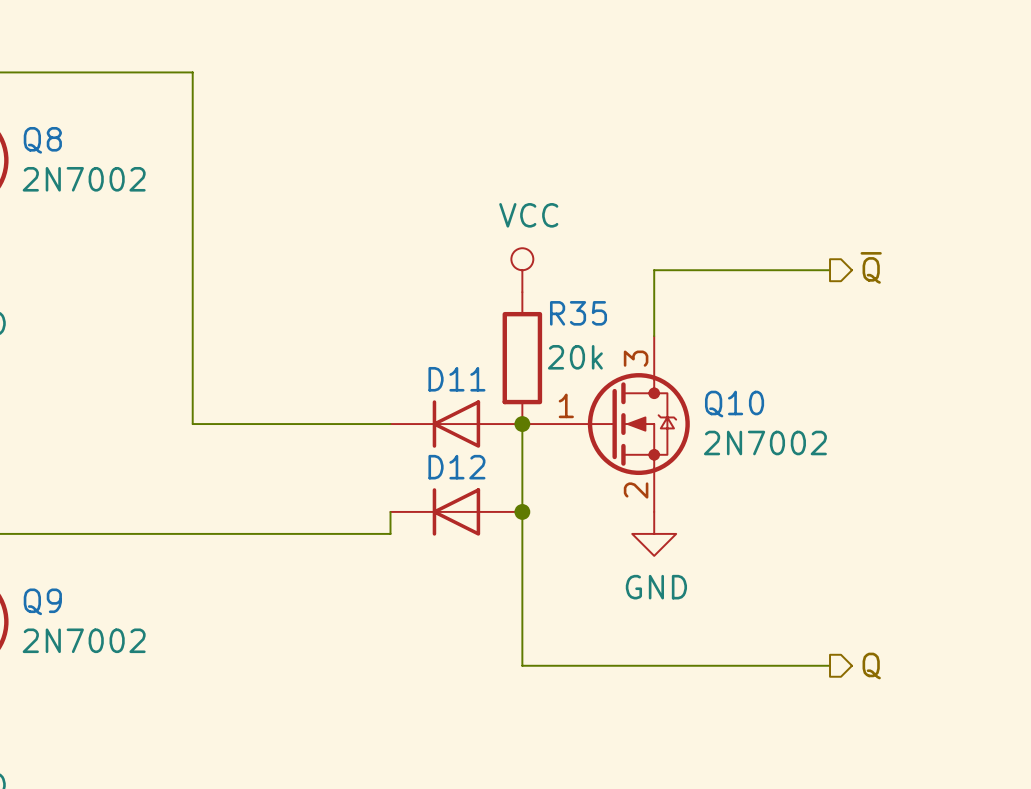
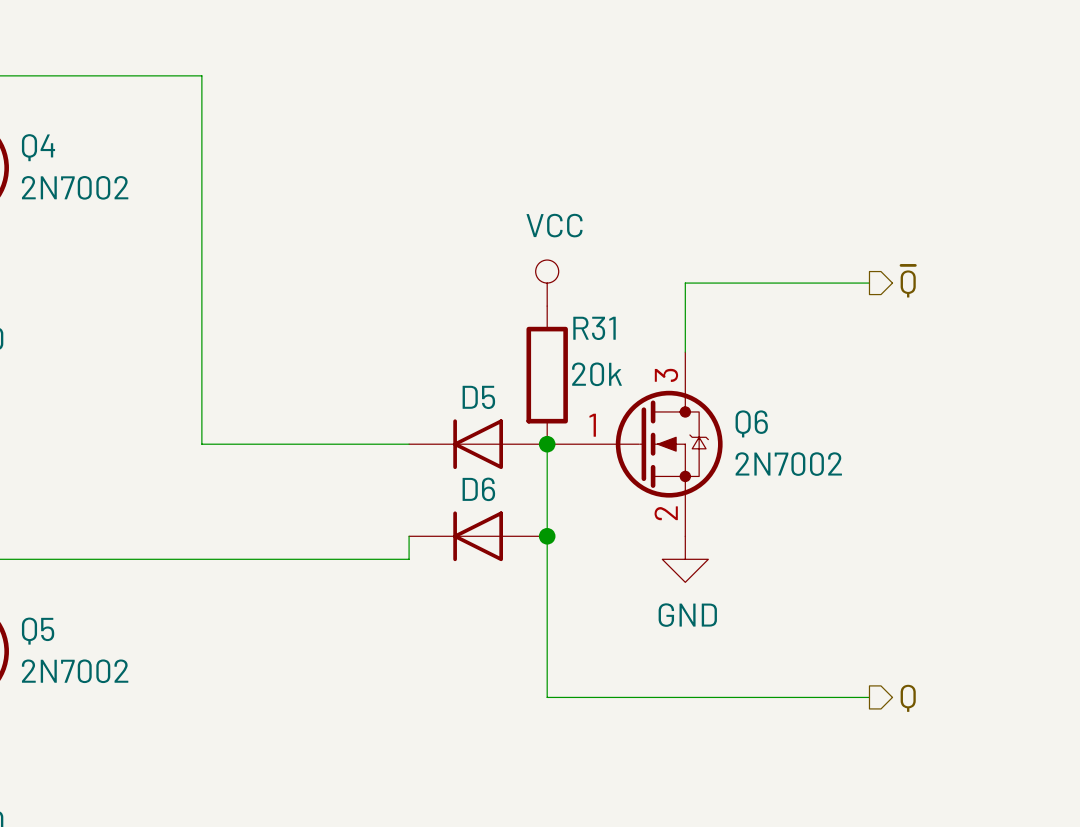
Q8 name: Q8 (42, 140) -> Q4 (38, 147)
R35 name: R35 (578, 313) -> R31 (594, 328)
D11 name: D11 (456, 379) -> D5 (478, 397)
Q10 name: Q10 (734, 404) -> Q6 (751, 423)
D12 name: D12 (456, 467) -> D6 (478, 489)
Q9 name: Q9 (42, 601) -> Q5 (38, 631)

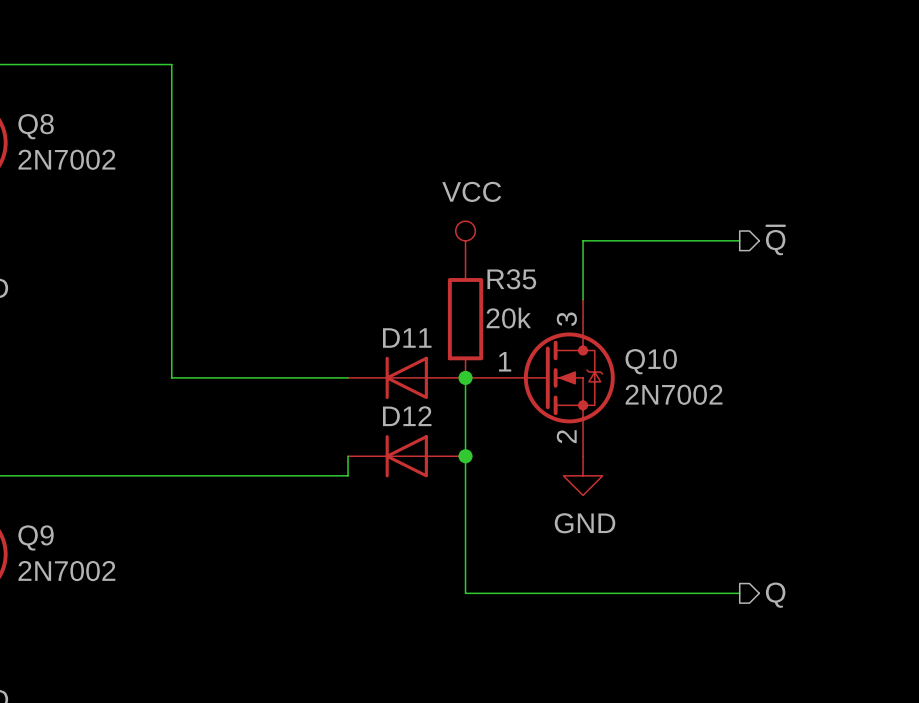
Q4 name: Q4 (38, 147) -> Q8 (36, 126)
R31 name: R31 (594, 328) -> R35 (511, 279)
D5 name: D5 (478, 397) -> D11 (407, 338)
Q6 name: Q6 (751, 423) -> Q10 (651, 361)
D6 name: D6 (478, 489) -> D12 (407, 416)
Q5 name: Q5 (38, 631) -> Q9 (36, 537)

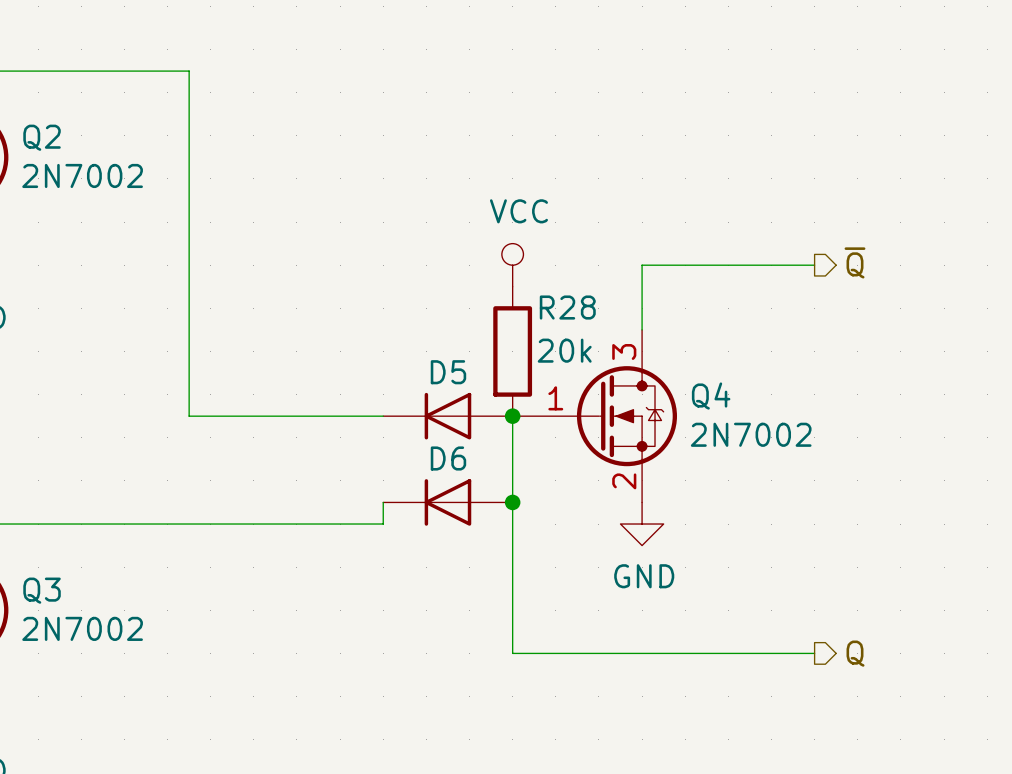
Q8 name: Q8 (36, 126) -> Q2 (42, 137)
R35 name: R35 (511, 279) -> R28 (567, 307)
D11 name: D11 (407, 338) -> D5 (448, 372)
Q10 name: Q10 (651, 361) -> Q4 (711, 396)
D12 name: D12 (407, 416) -> D6 (448, 458)
Q9 name: Q9 (36, 537) -> Q3 (42, 590)

